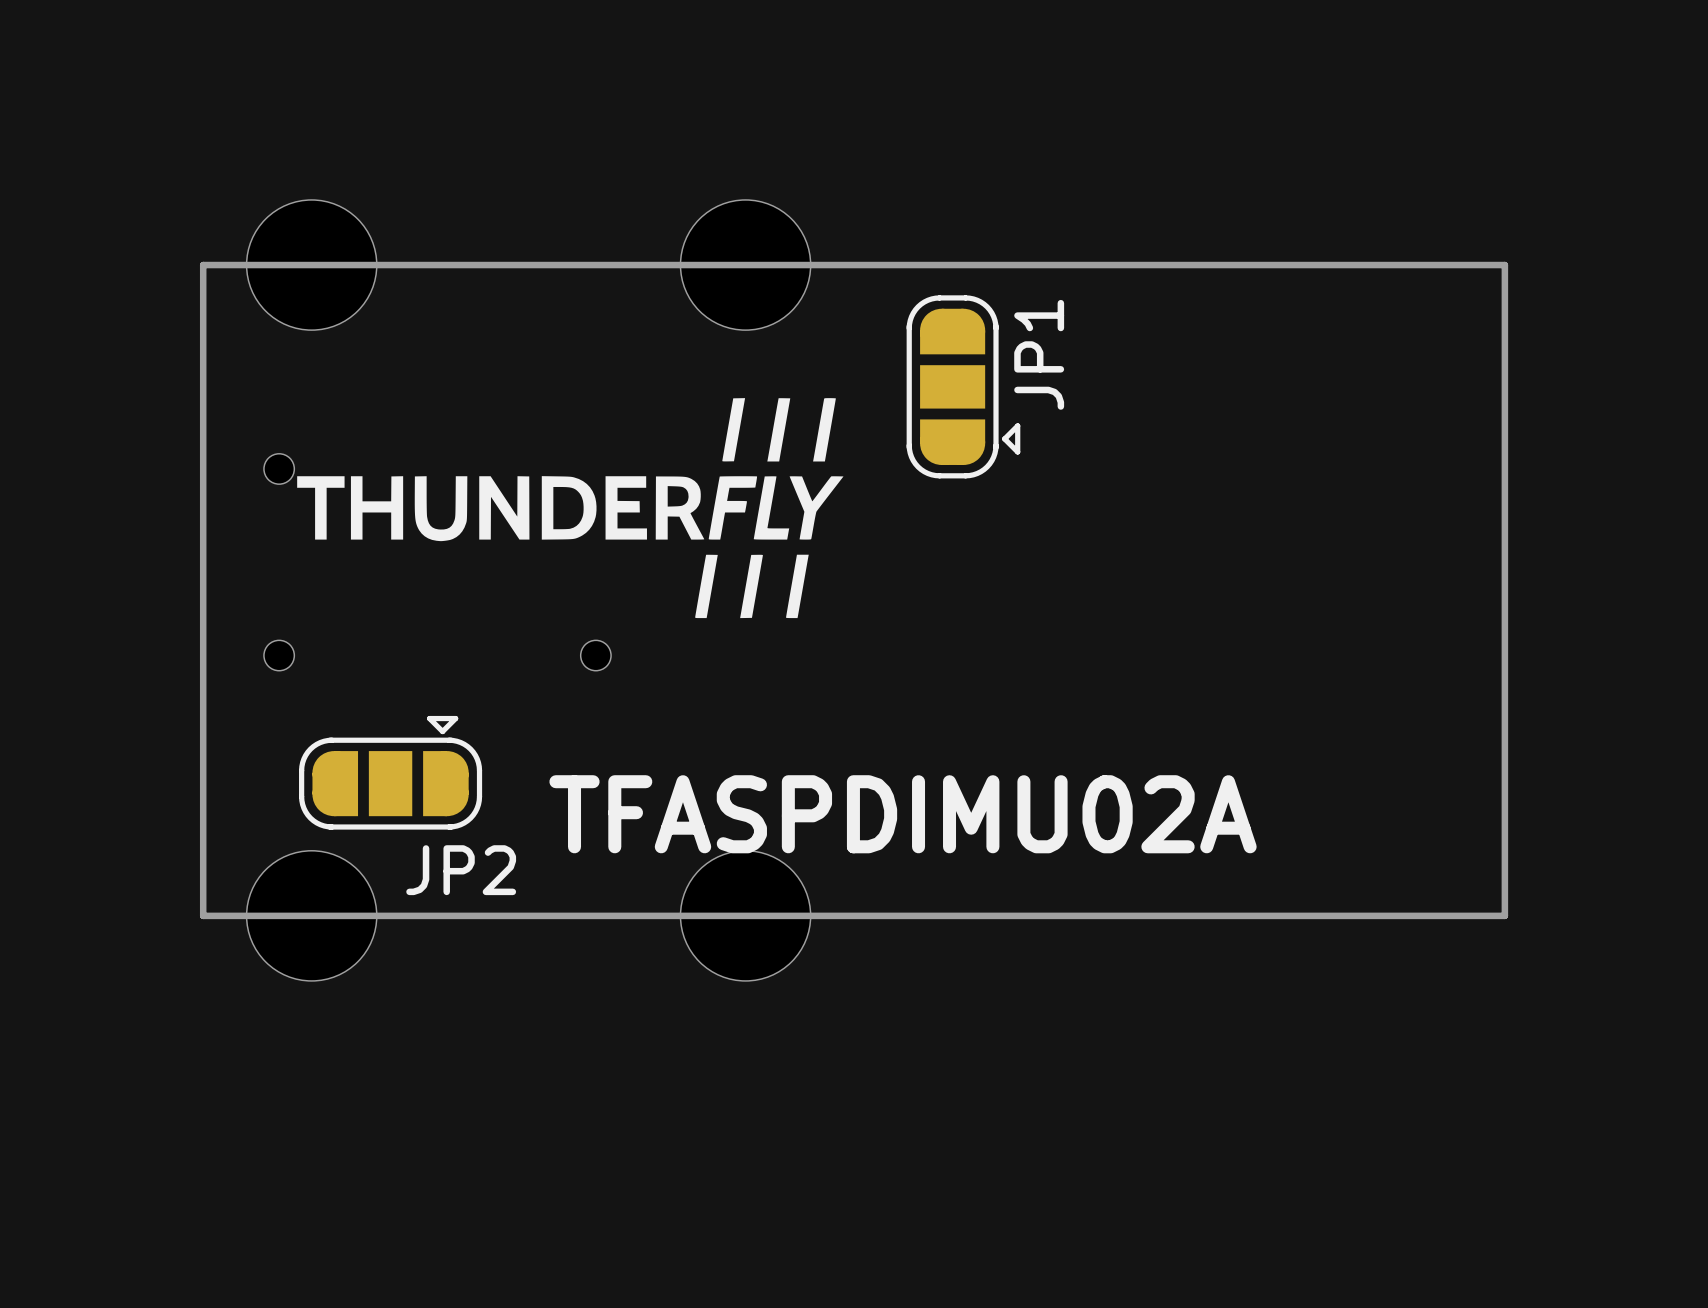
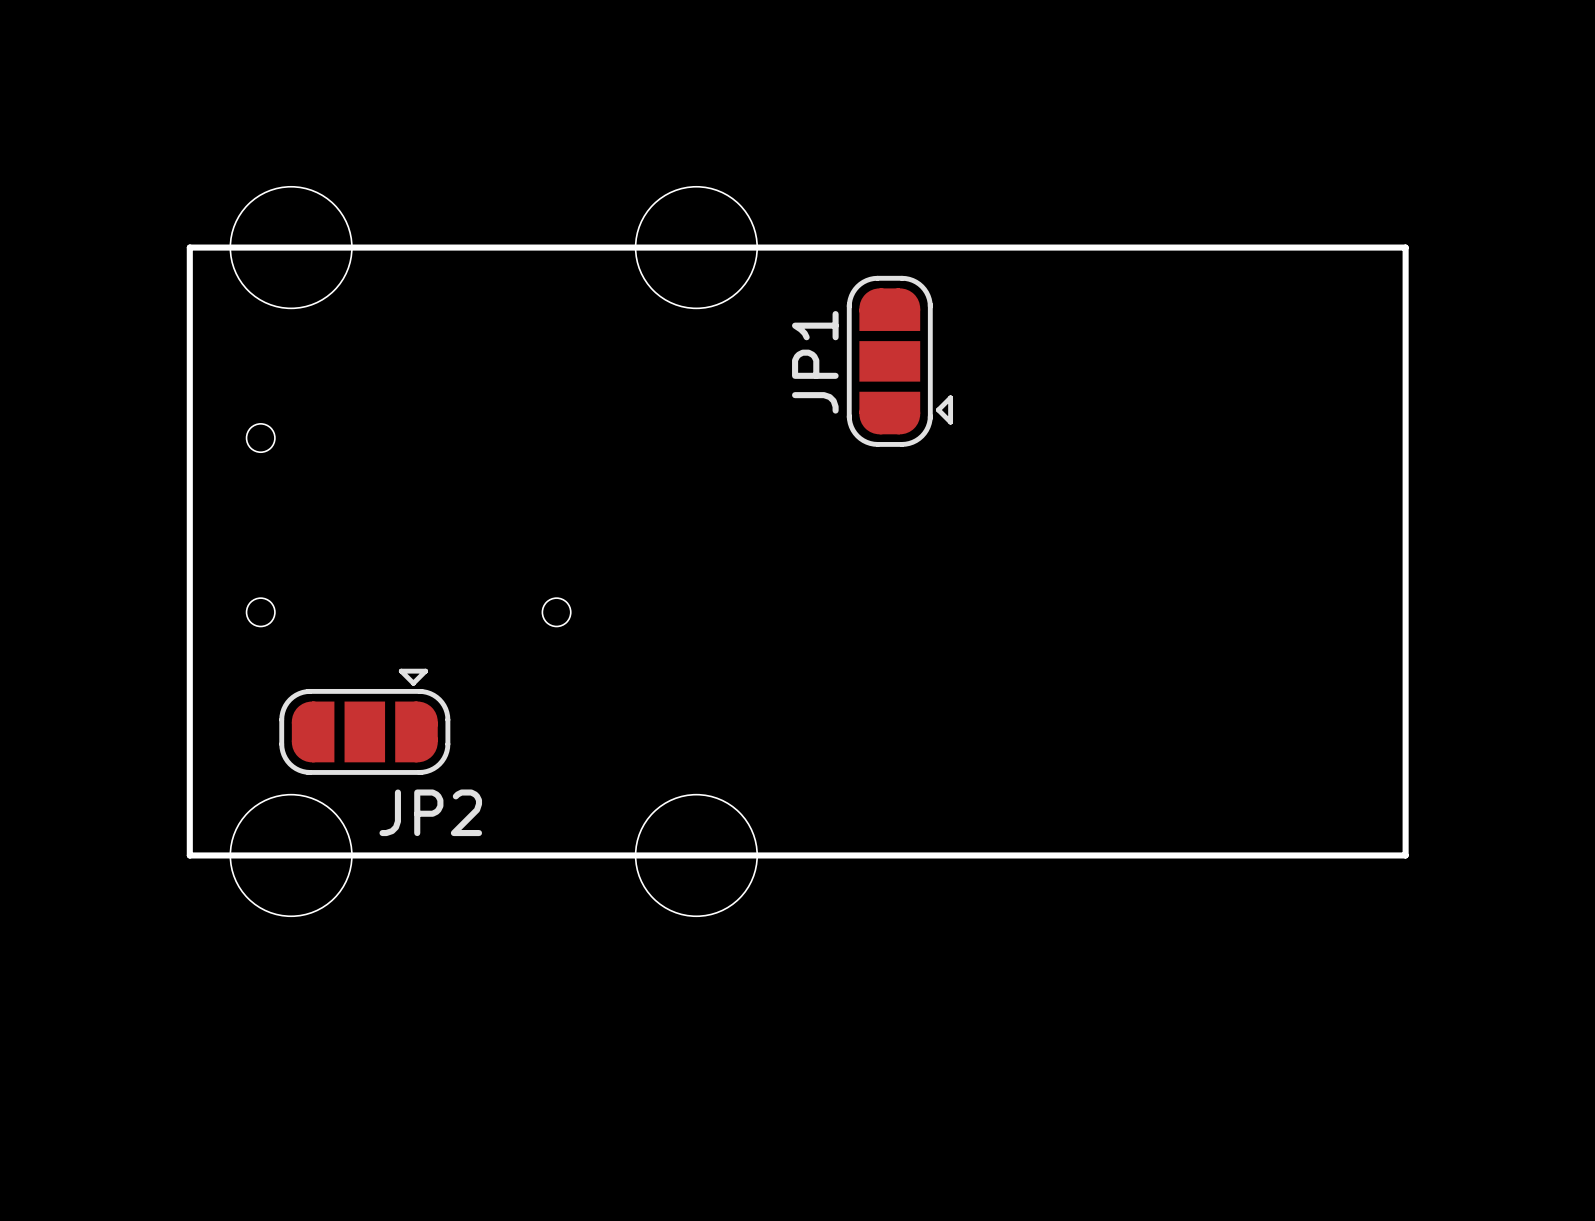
JP1 name position: JP1 (1039, 354) -> JP1 (815, 362)
drawing: [297, 398, 844, 619] -> none
text: TFASPDIMU02A (903, 814) -> none

